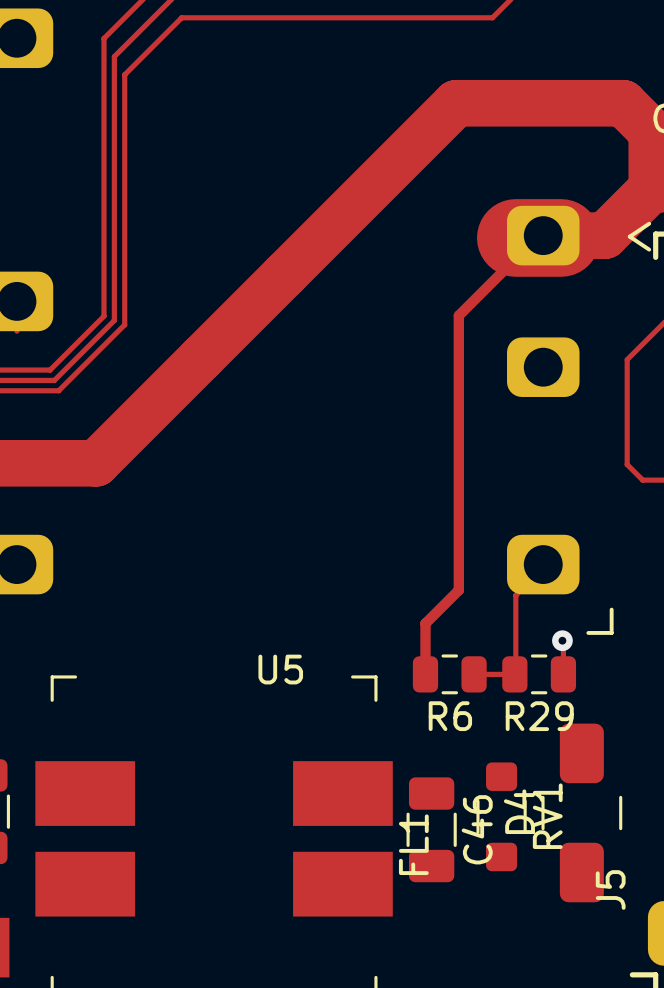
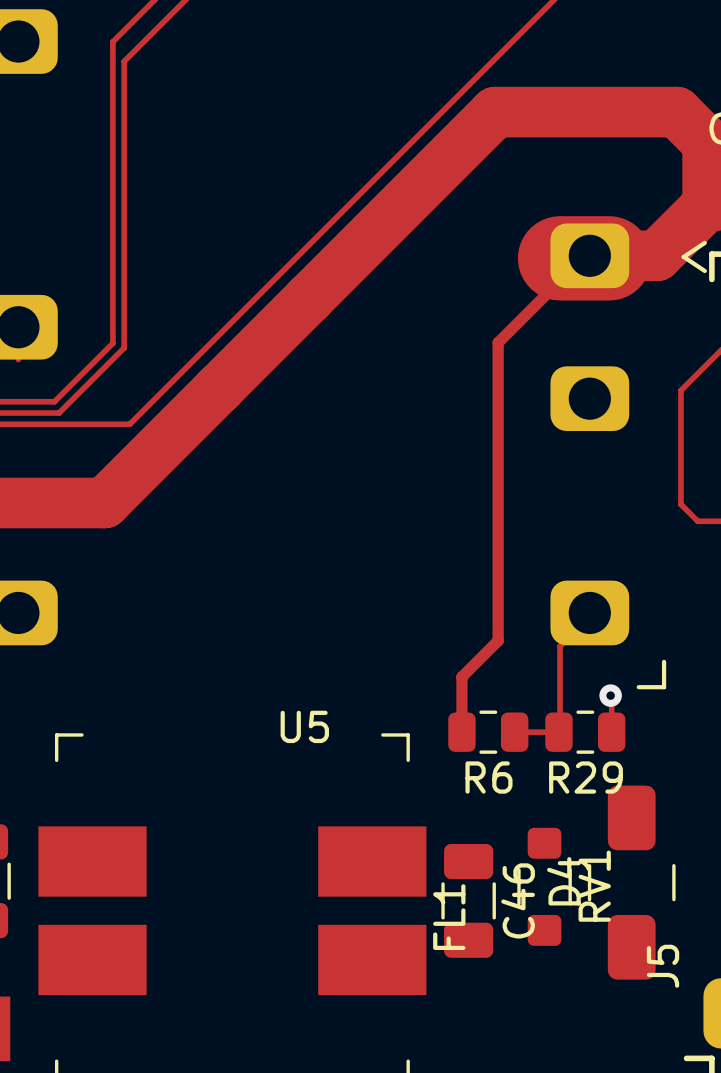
track: (492, 17) (181, 17) (124, 74) (124, 324) (58, 390) -> (534, 19) (129, 424) (63, 424)

